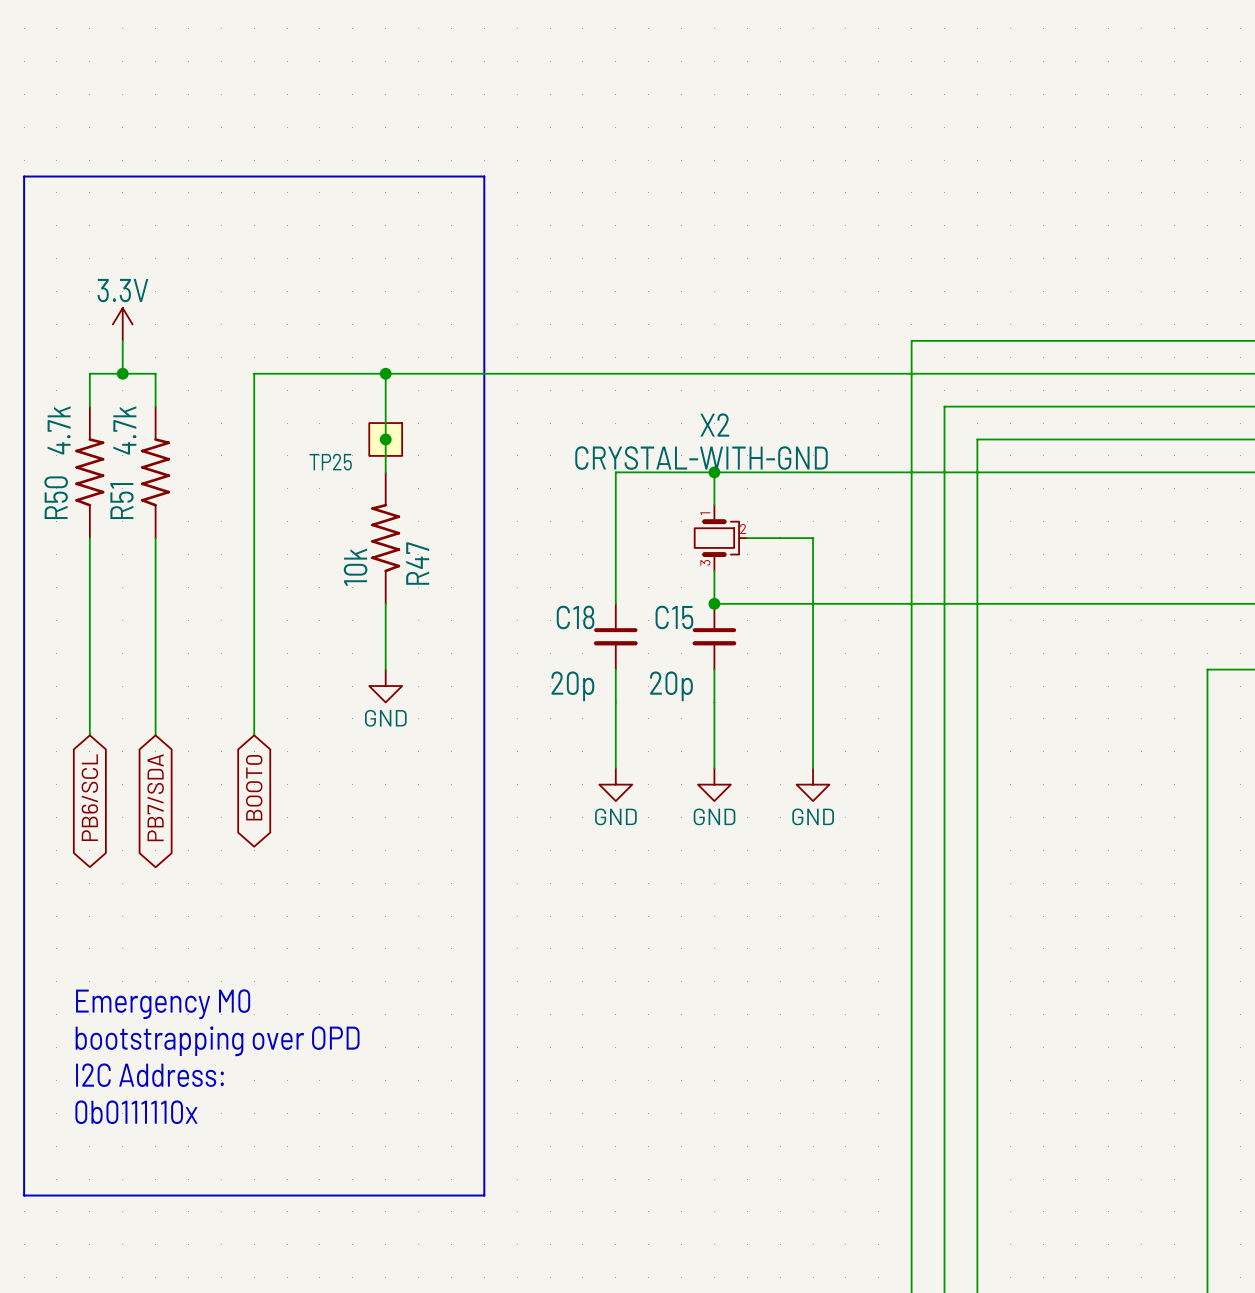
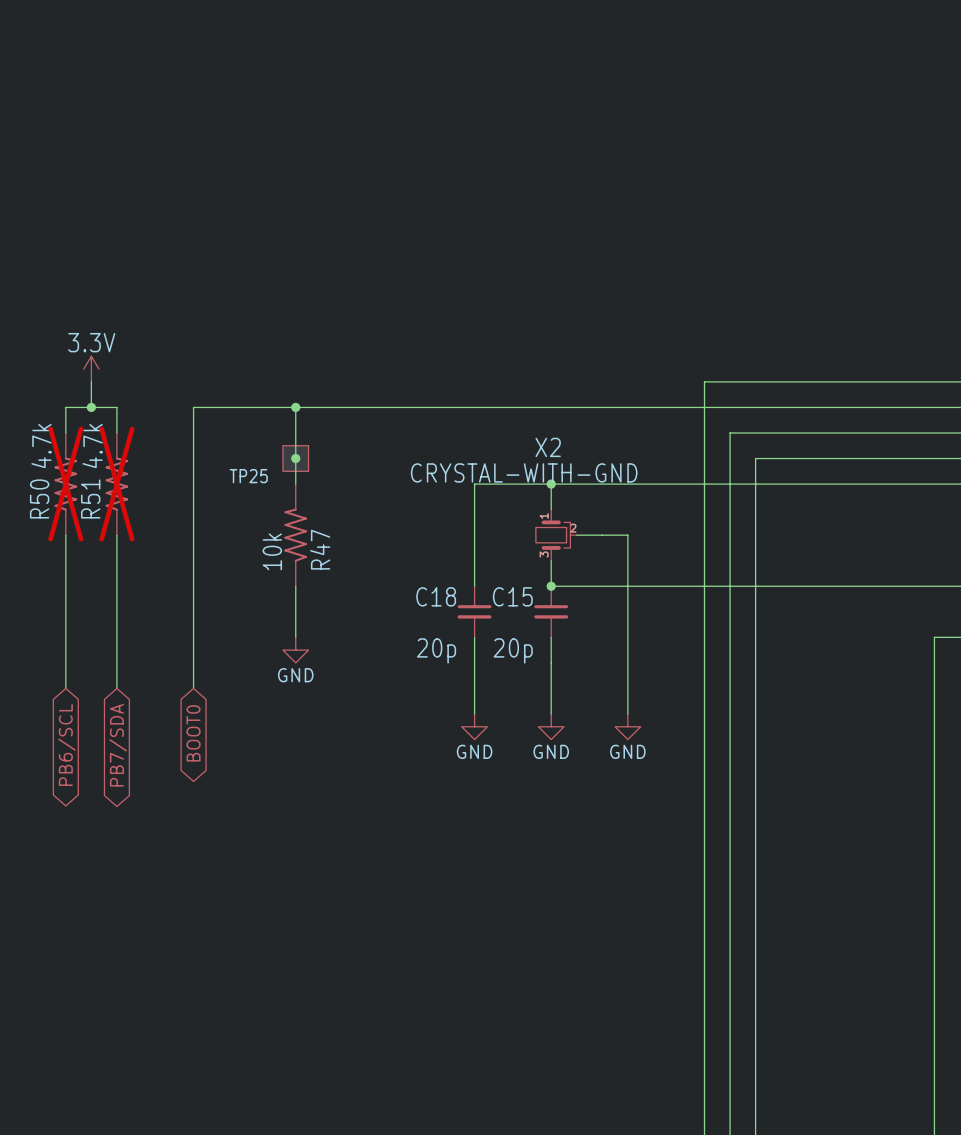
line: (24, 176) (484, 176) (484, 1195) (24, 1195) (24, 176) -> none
R50 do-not-place cross: none -> (65, 484)
R51 do-not-place cross: none -> (116, 484)
text: Emergency M0 (163, 1004) -> none
text: bootstrapping over OPD (217, 1041) -> none
text: I2C Address: (149, 1075) -> none
text: 0b0111110x (136, 1112) -> none

